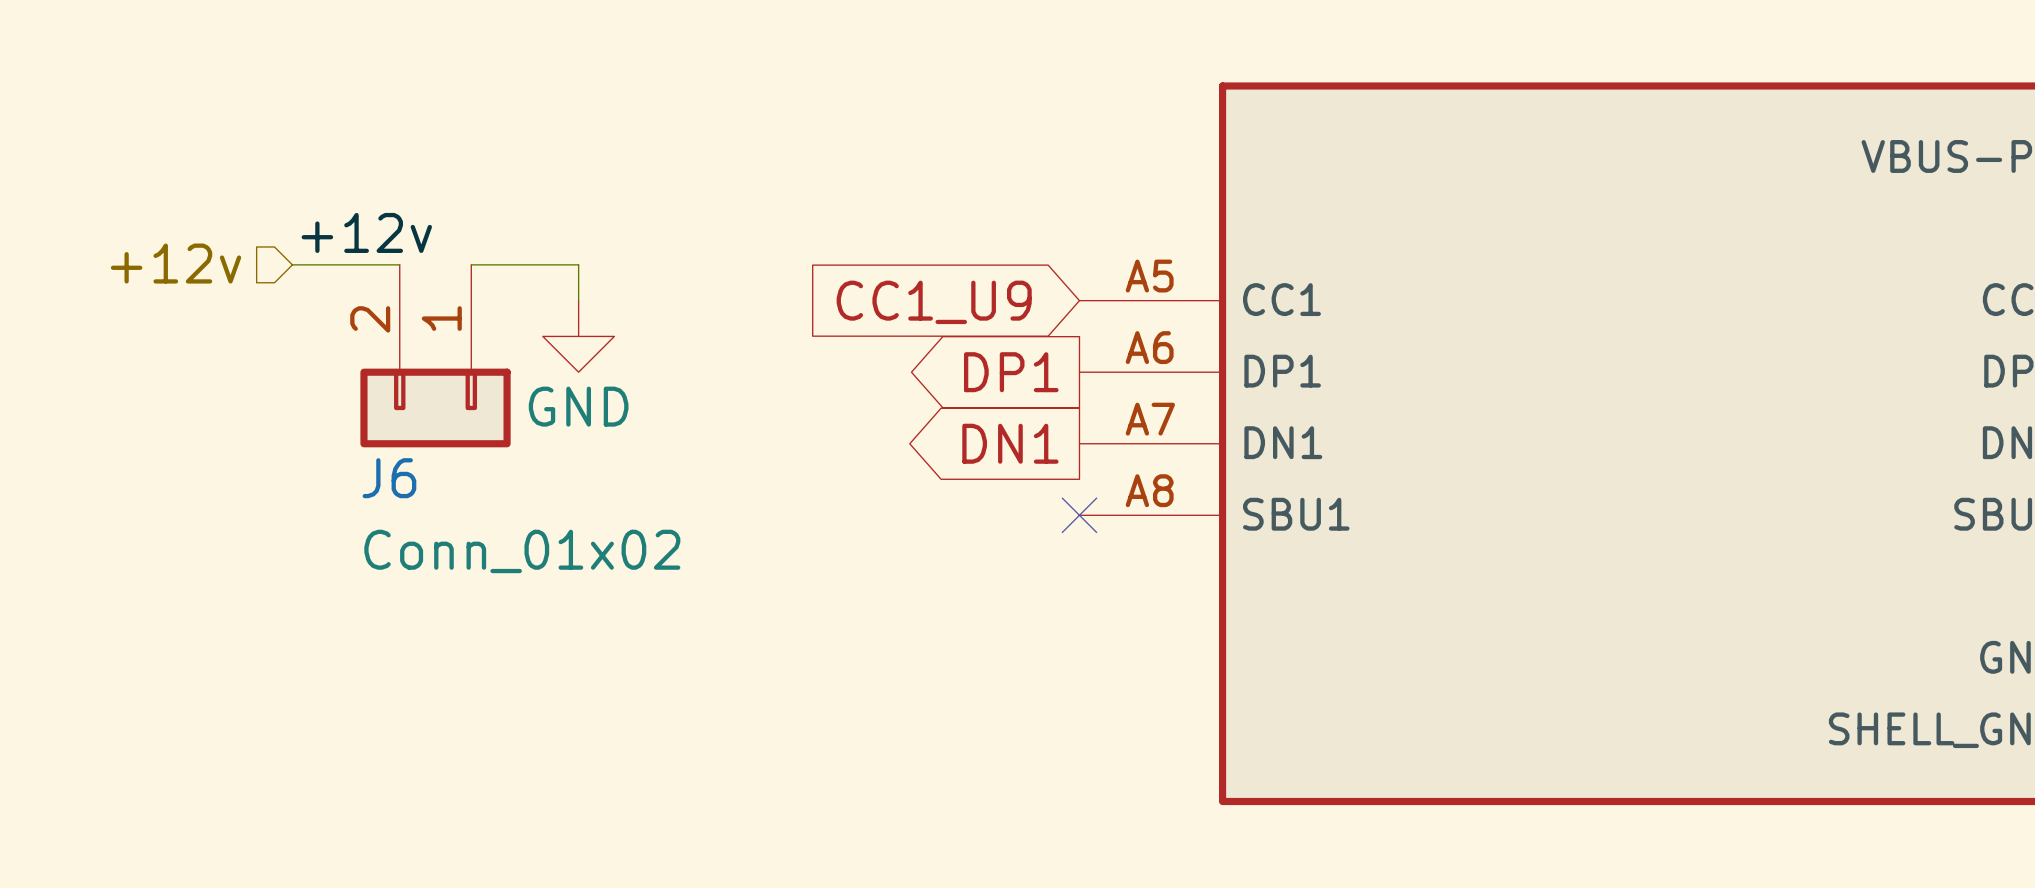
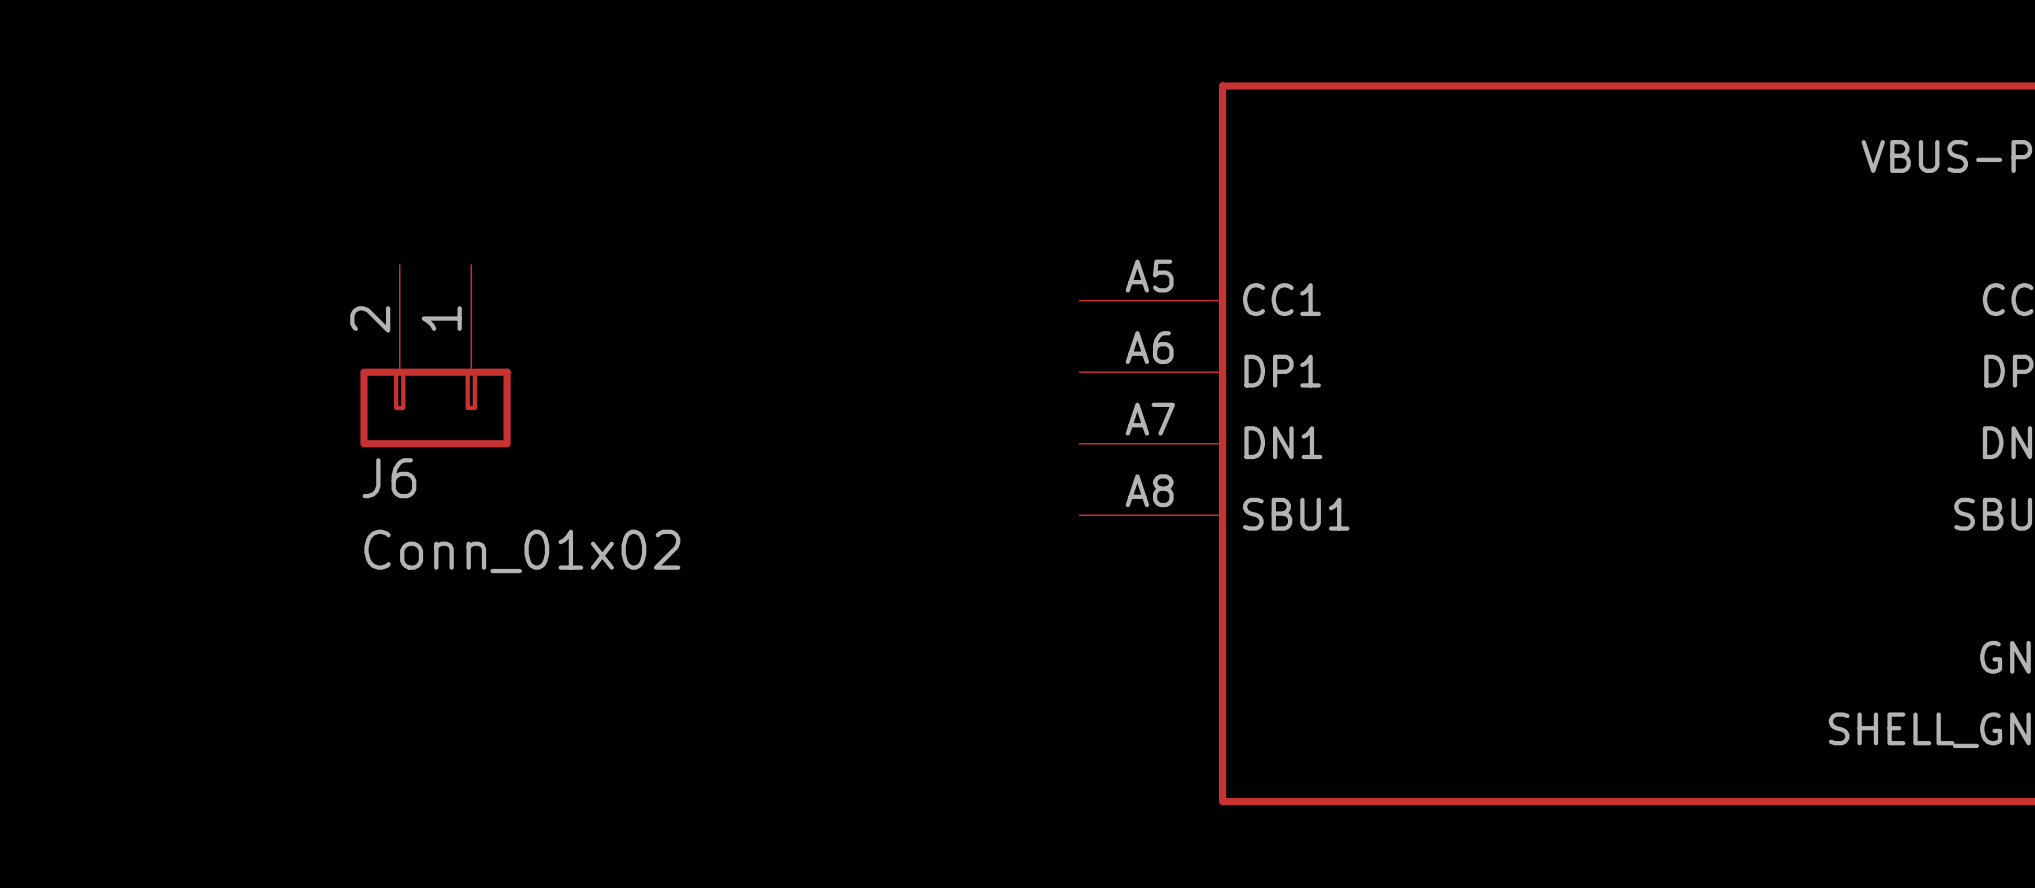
label: +12v (366, 232) -> none
hierarchical label: +12v (176, 263) -> none
wire: (292, 264) (399, 264) -> none
wire: (471, 264) (578, 264) (578, 300) -> none
global label: CC1_U9 (934, 302) -> none
power symbol: GND (578, 336) -> none
global label: DP1 (1011, 372) -> none
global label: DN1 (1010, 443) -> none
no-connect mark: (1079, 515) -> none

